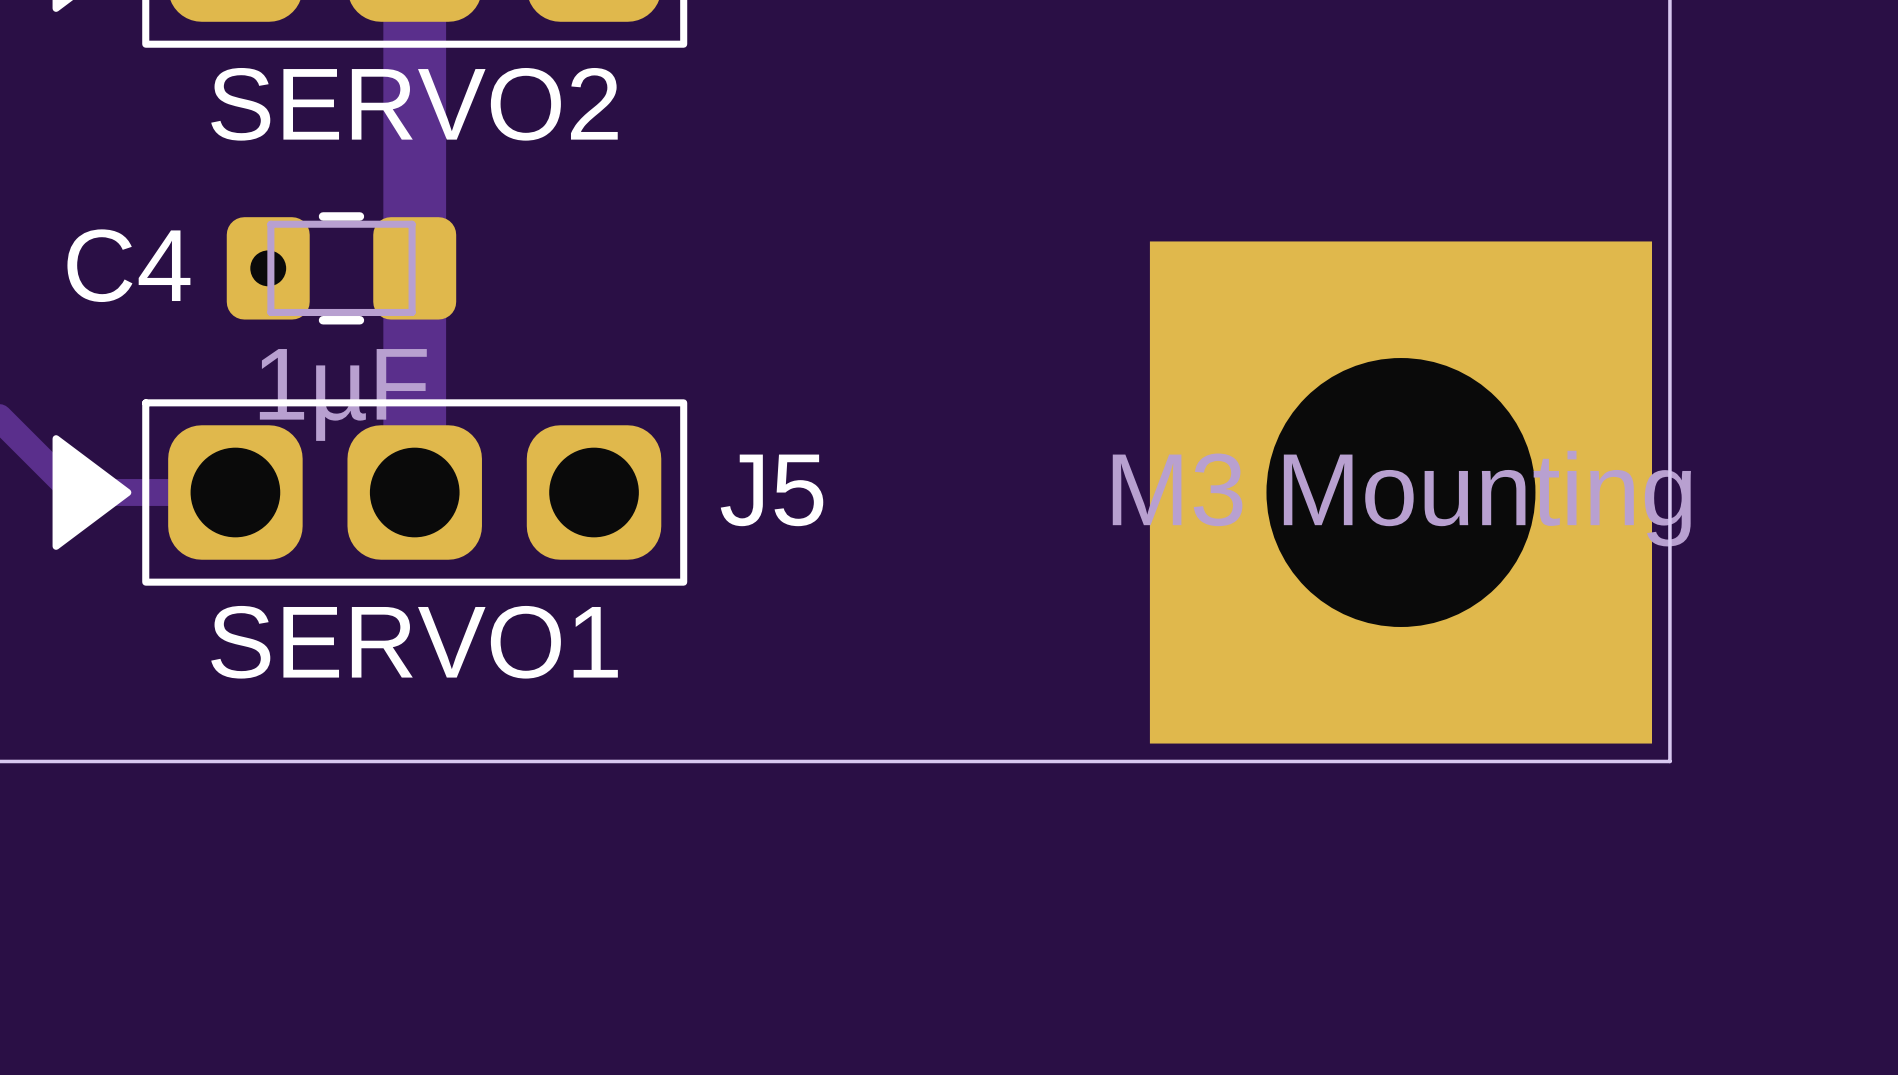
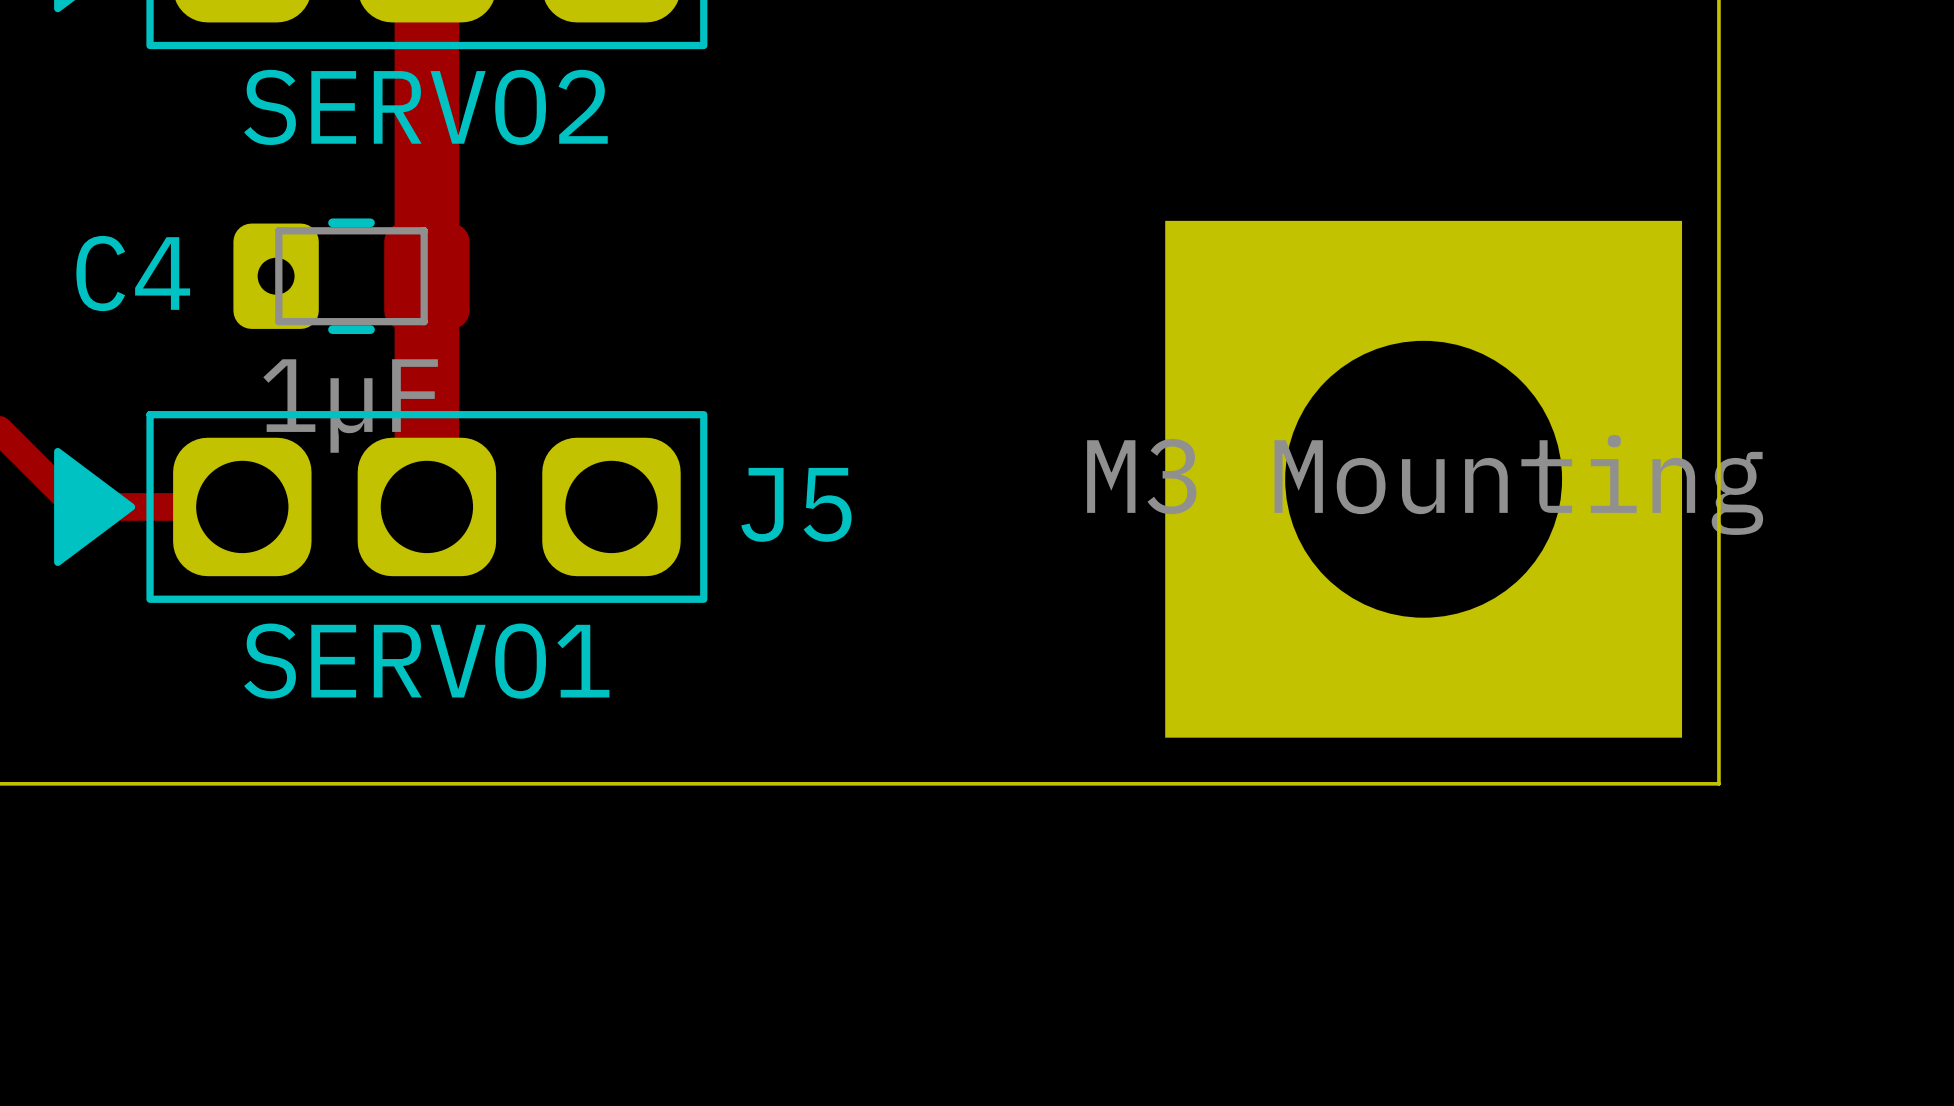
part position: (1400, 492) -> (1423, 479)

